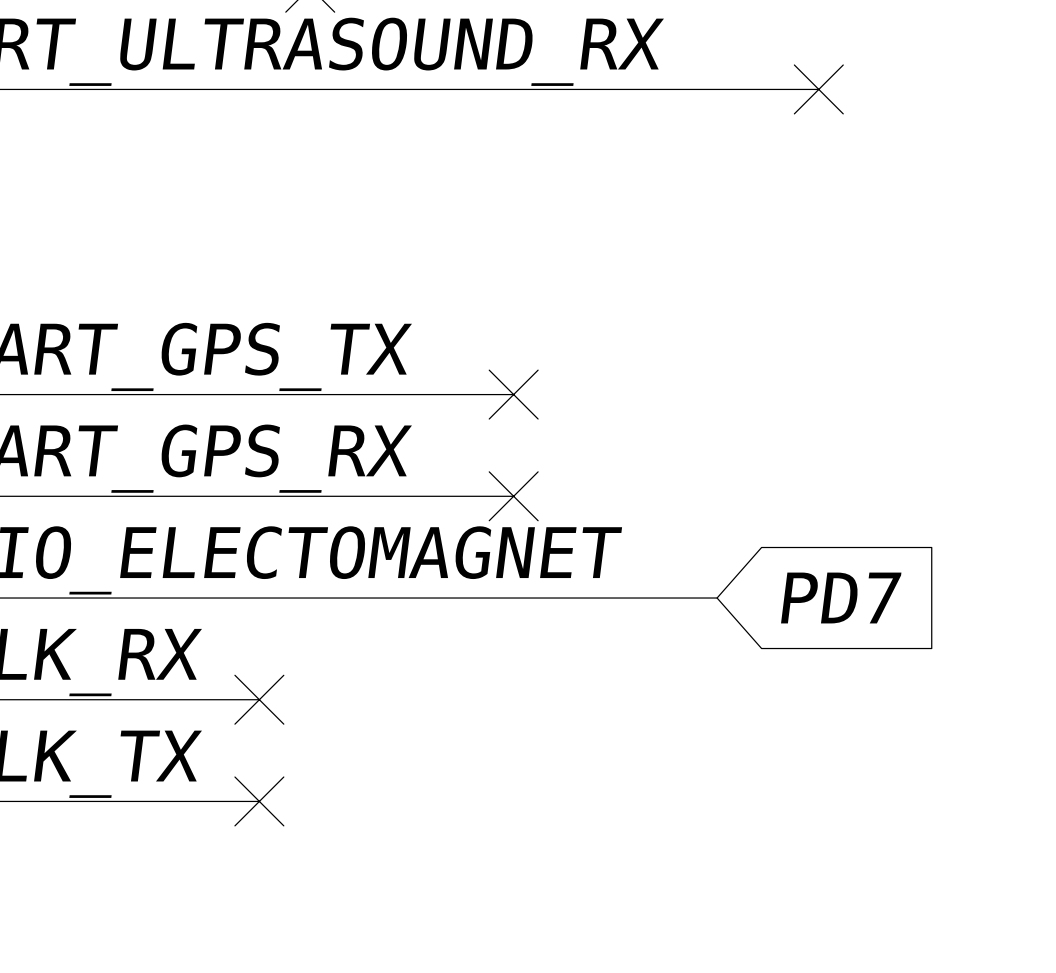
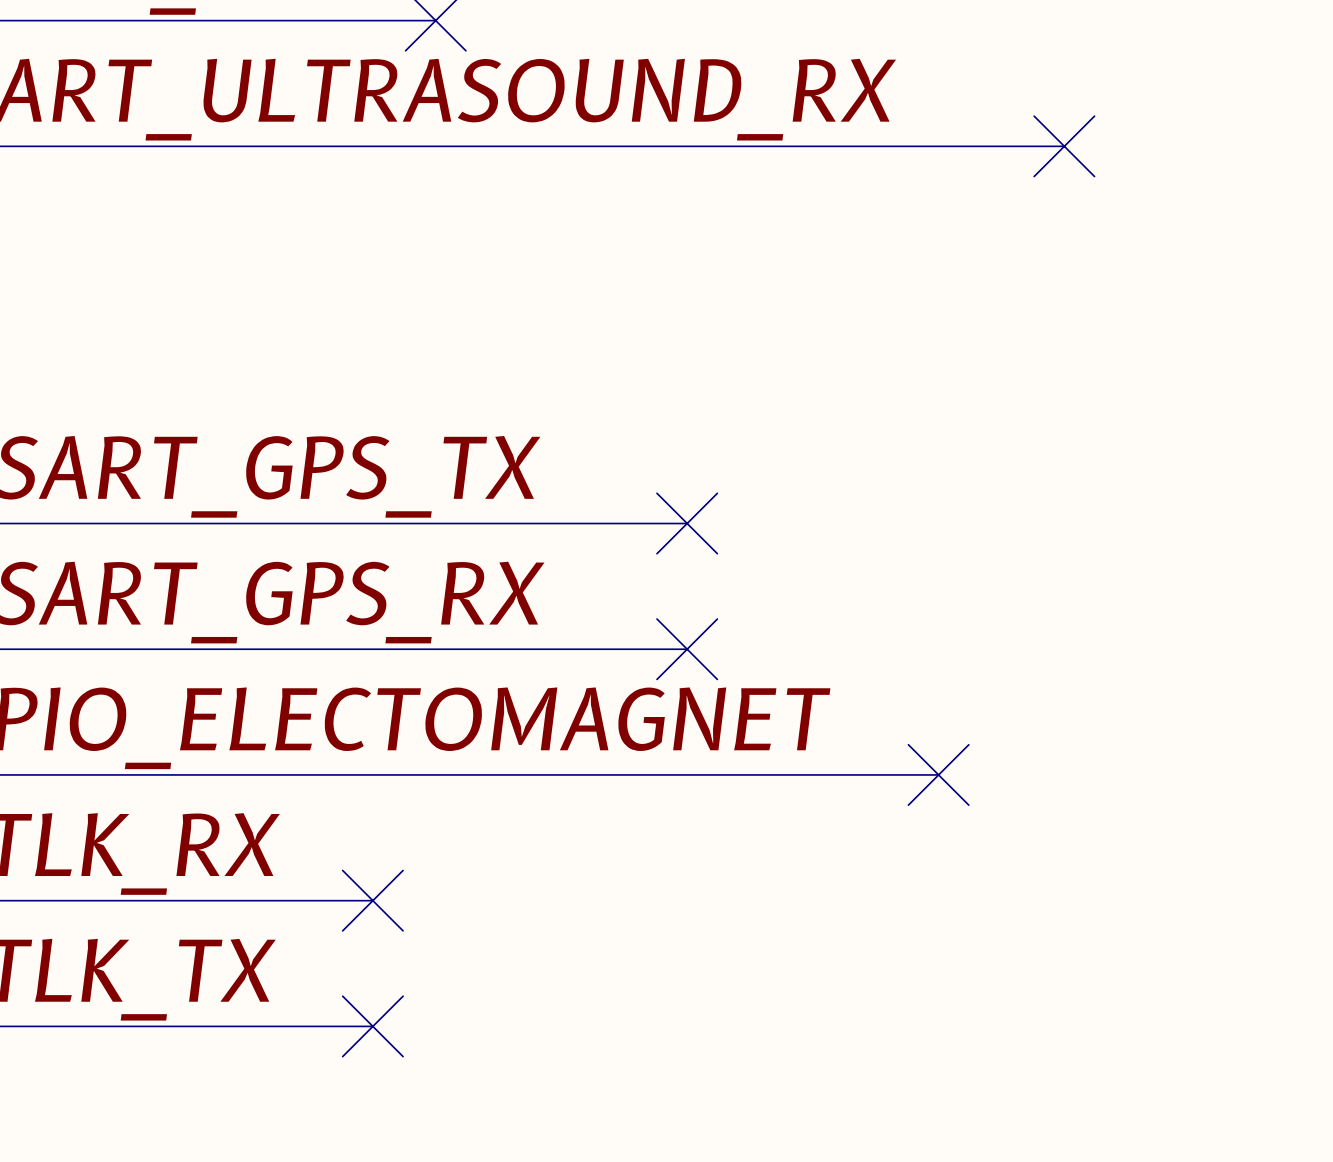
no-connect mark: none -> (938, 774)
global label: PD7 (841, 598) -> none

